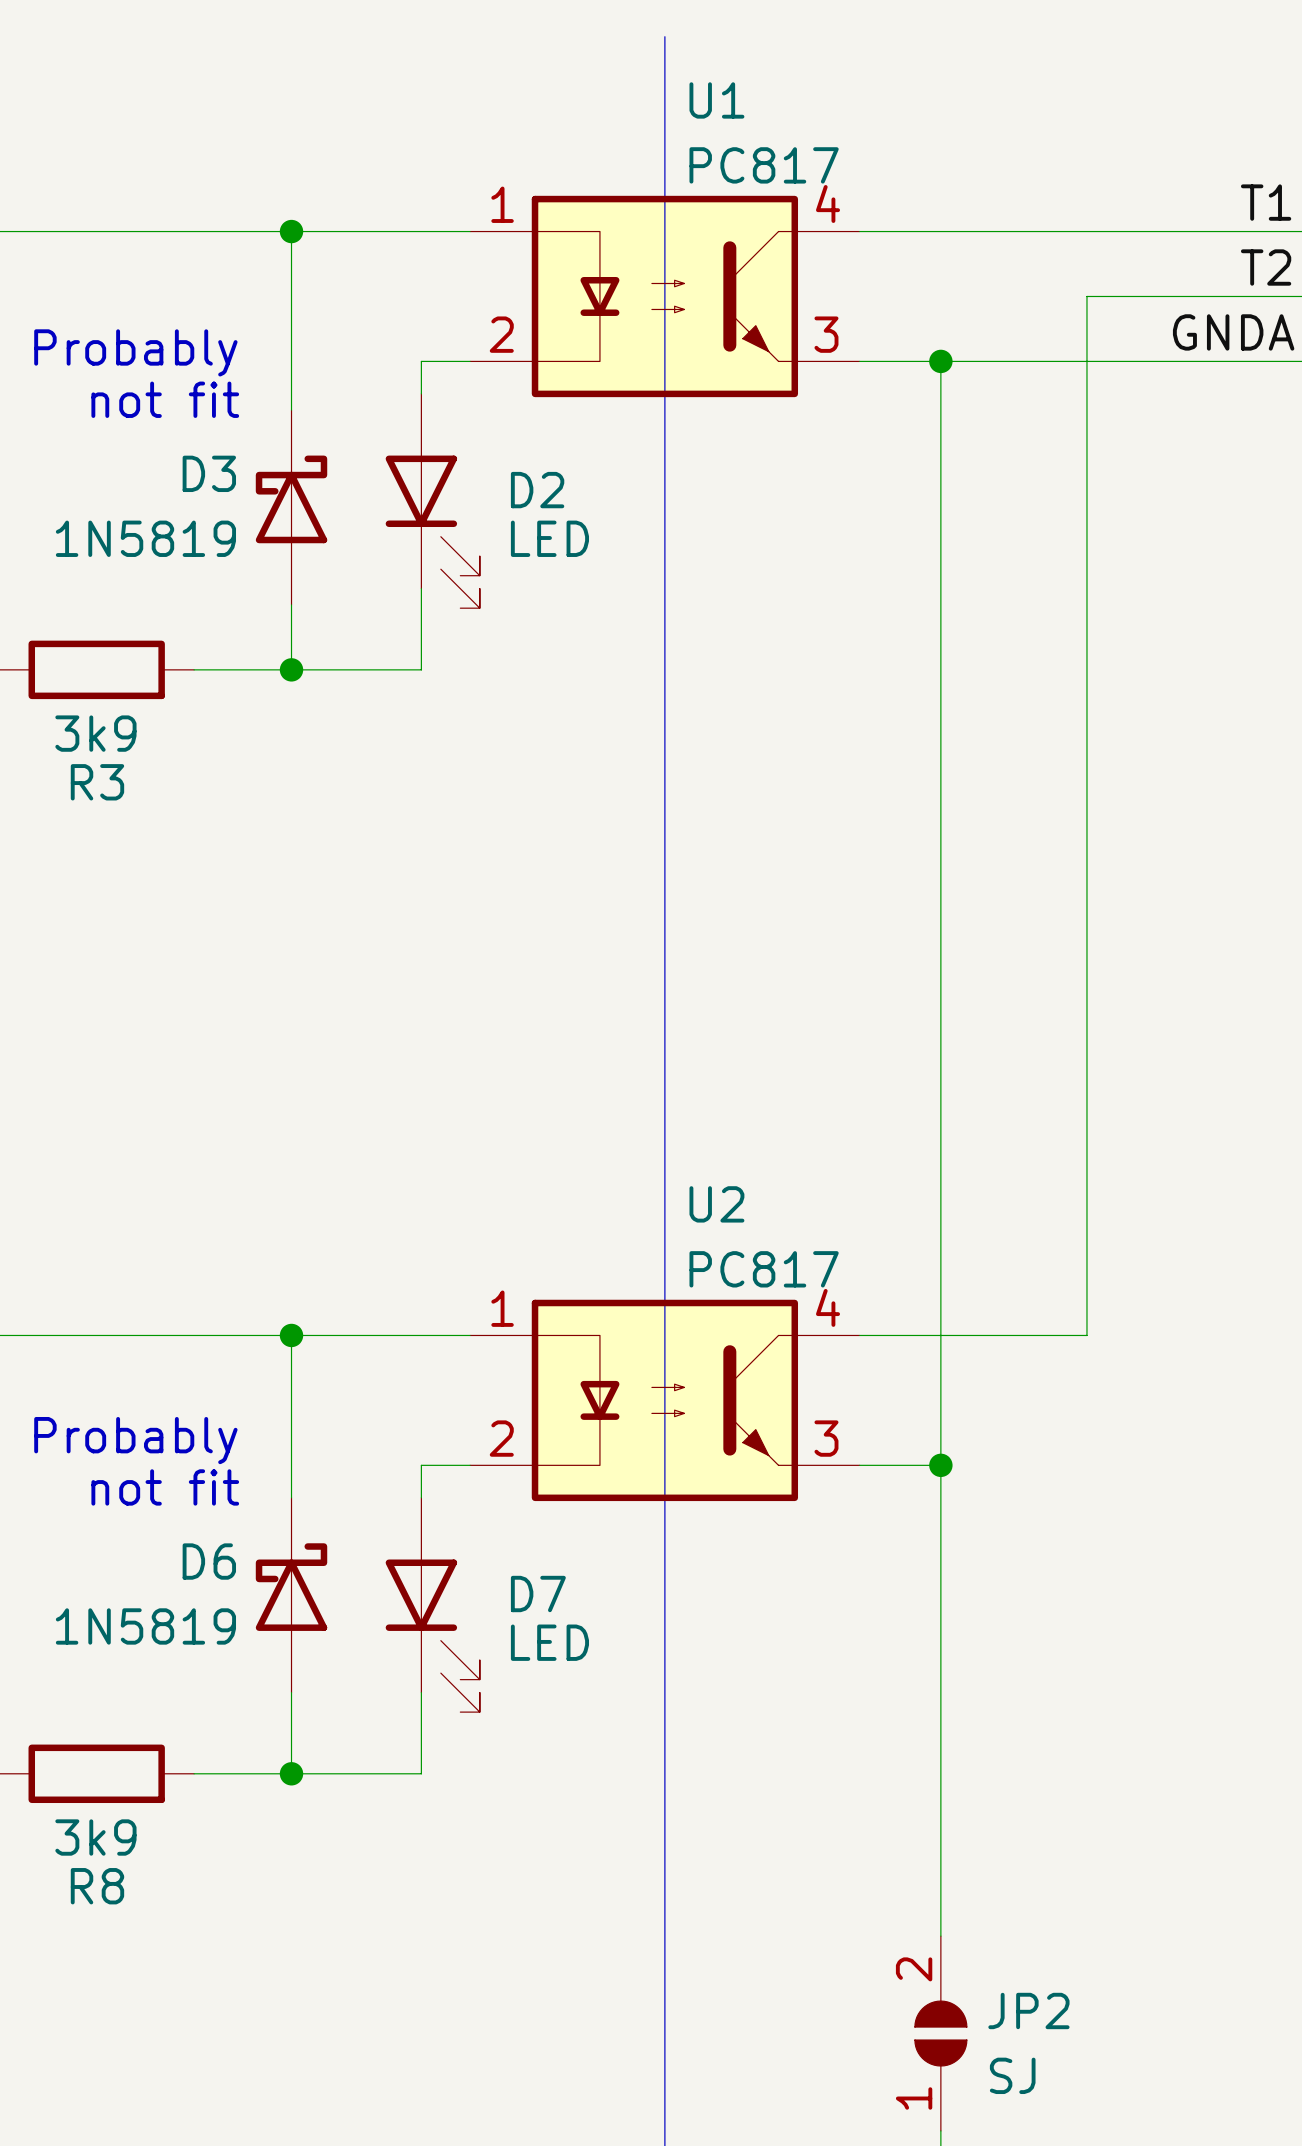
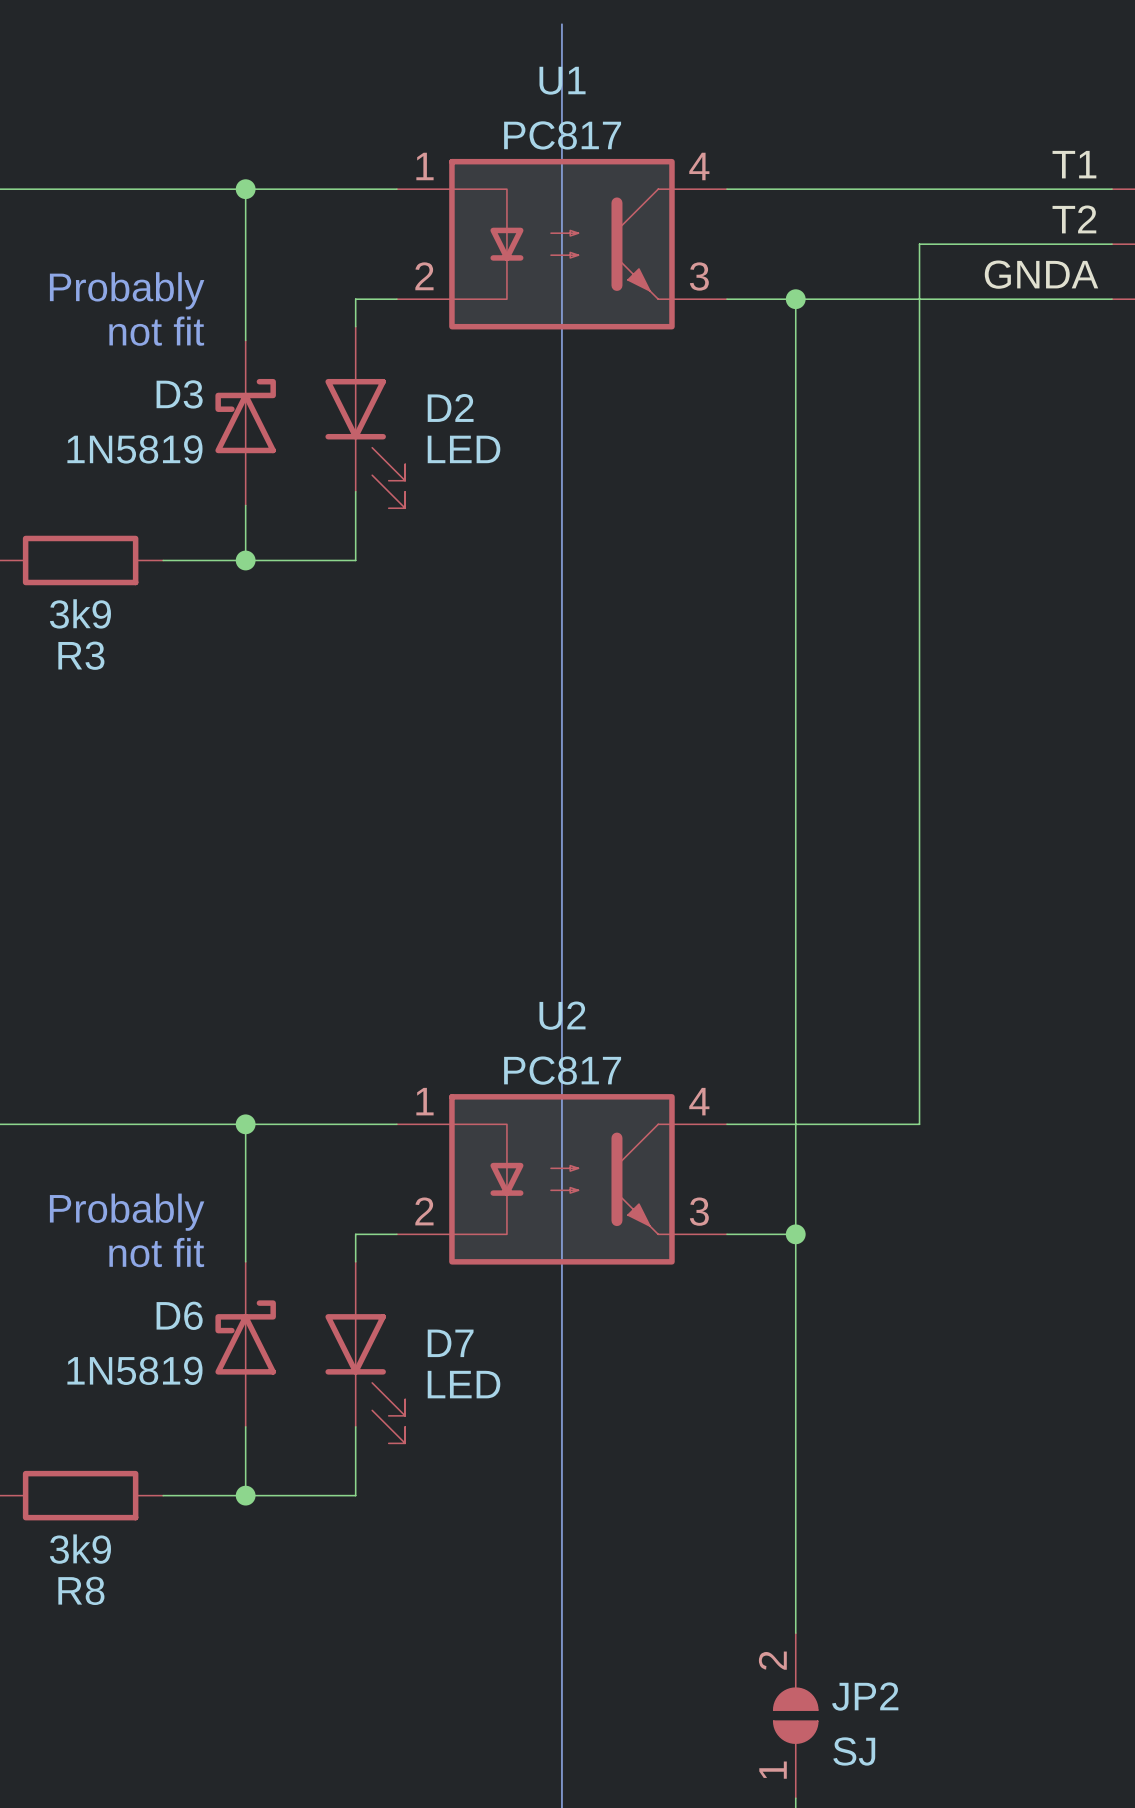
U1 name position: U1 (716, 100) -> U1 (562, 80)
U1 value position: PC817 (764, 165) -> PC817 (562, 135)
U2 name position: U2 (716, 1204) -> U2 (562, 1015)
U2 value position: PC817 (764, 1269) -> PC817 (562, 1070)

